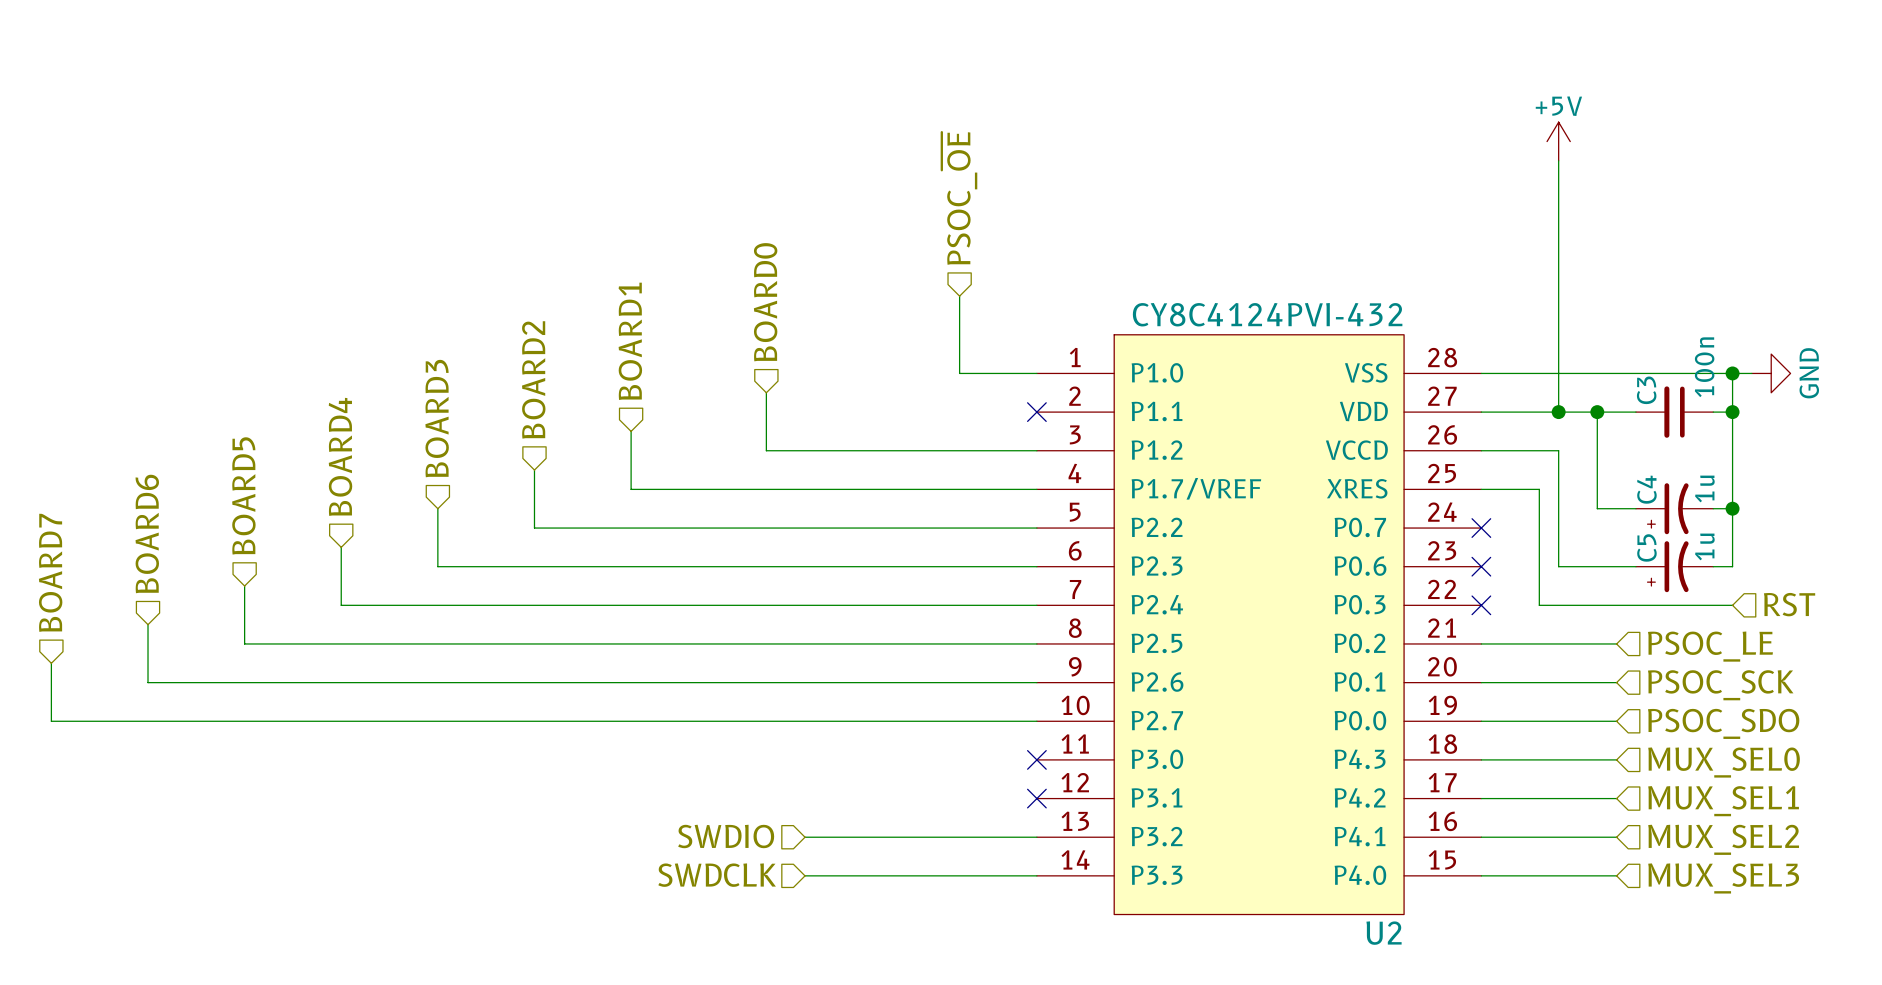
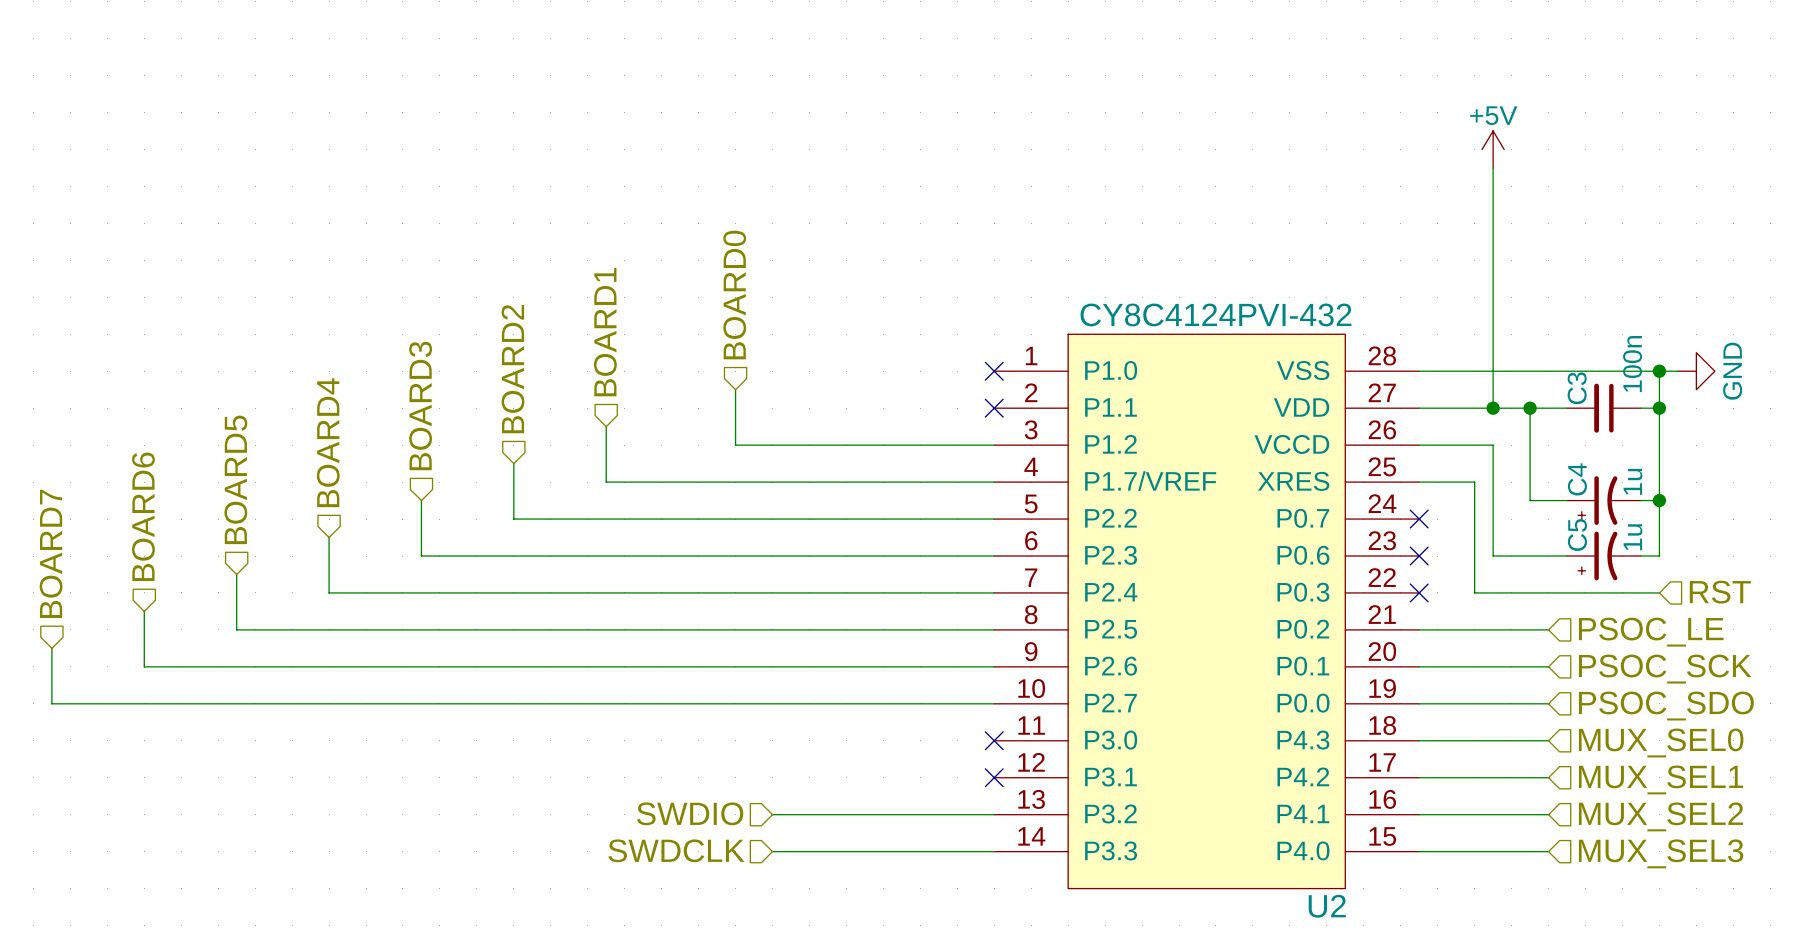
hierarchical label: PSOC_~{OE} (959, 198) -> none
wire: (959, 296) (959, 373) (1036, 373) -> none
no-connect mark: none -> (994, 371)

